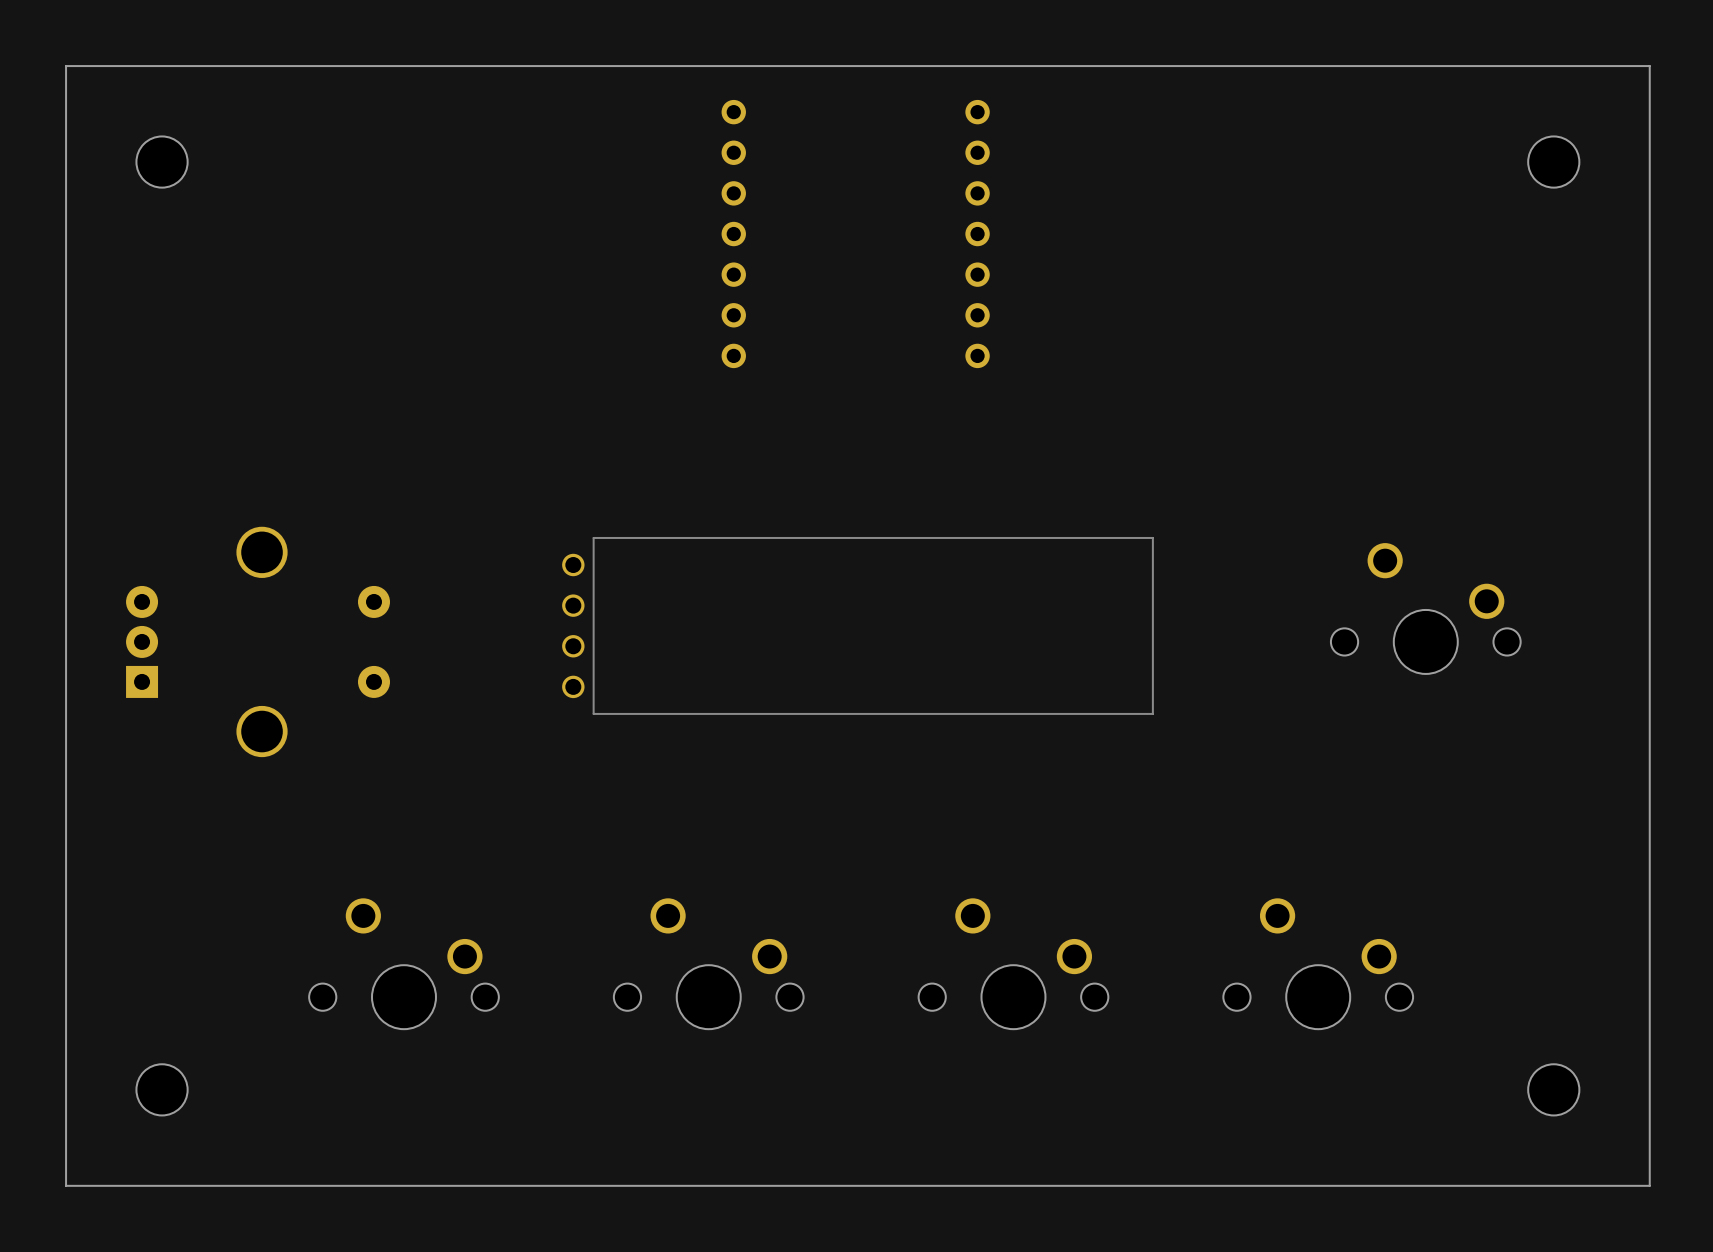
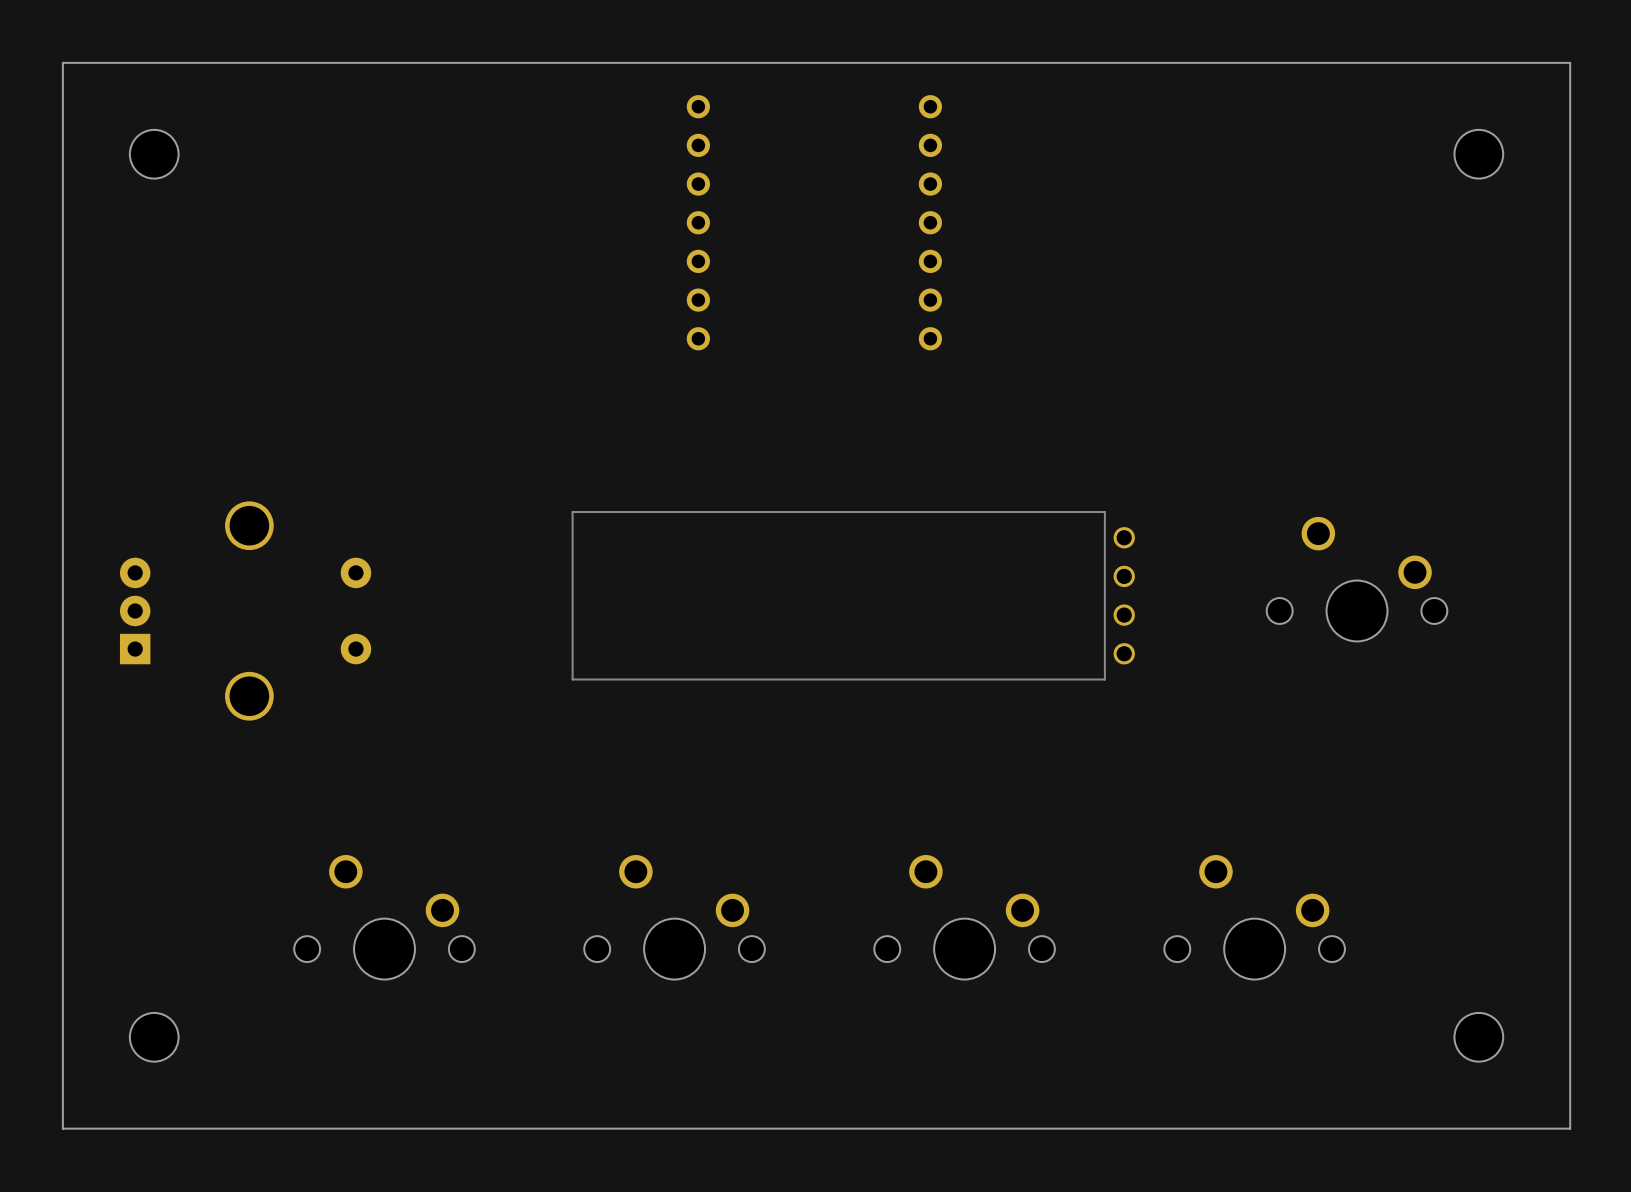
part rotation: 0° (857, 625) -> 180° (853, 595)

